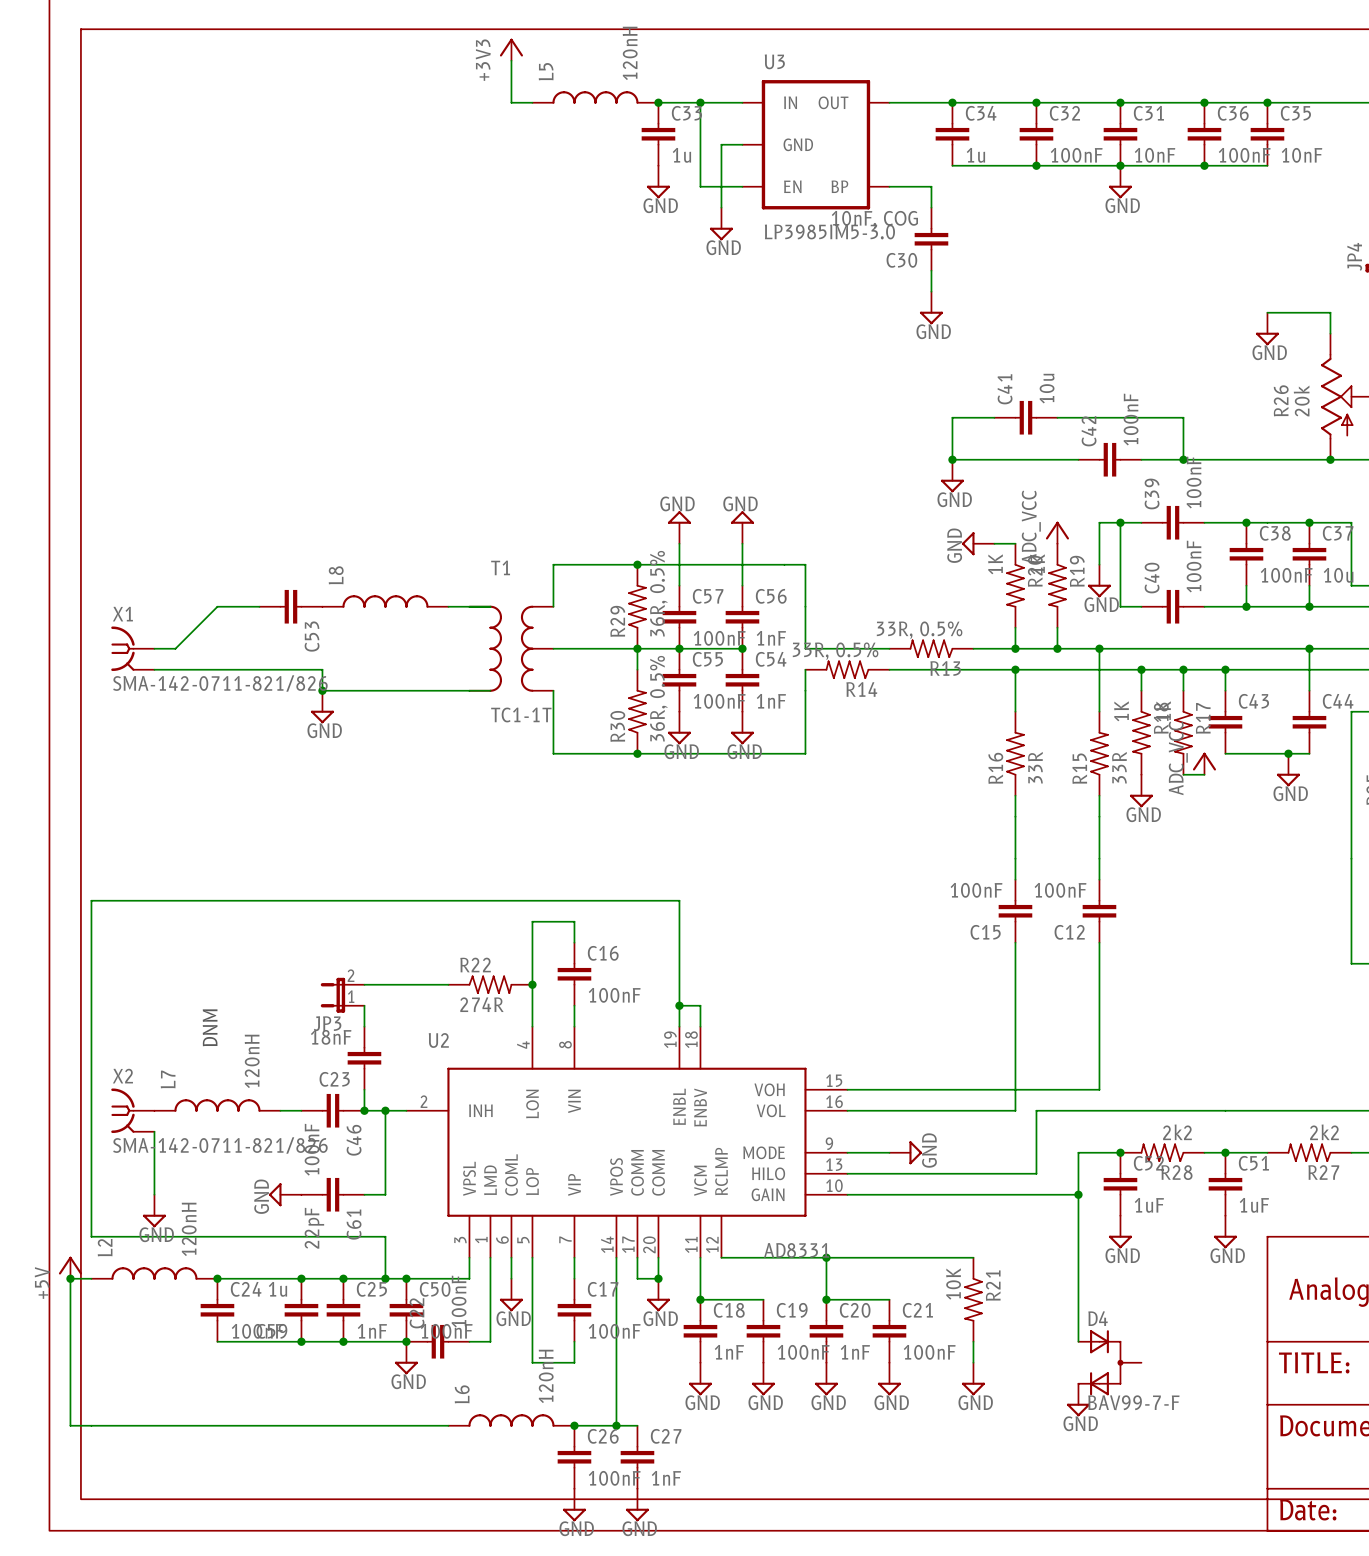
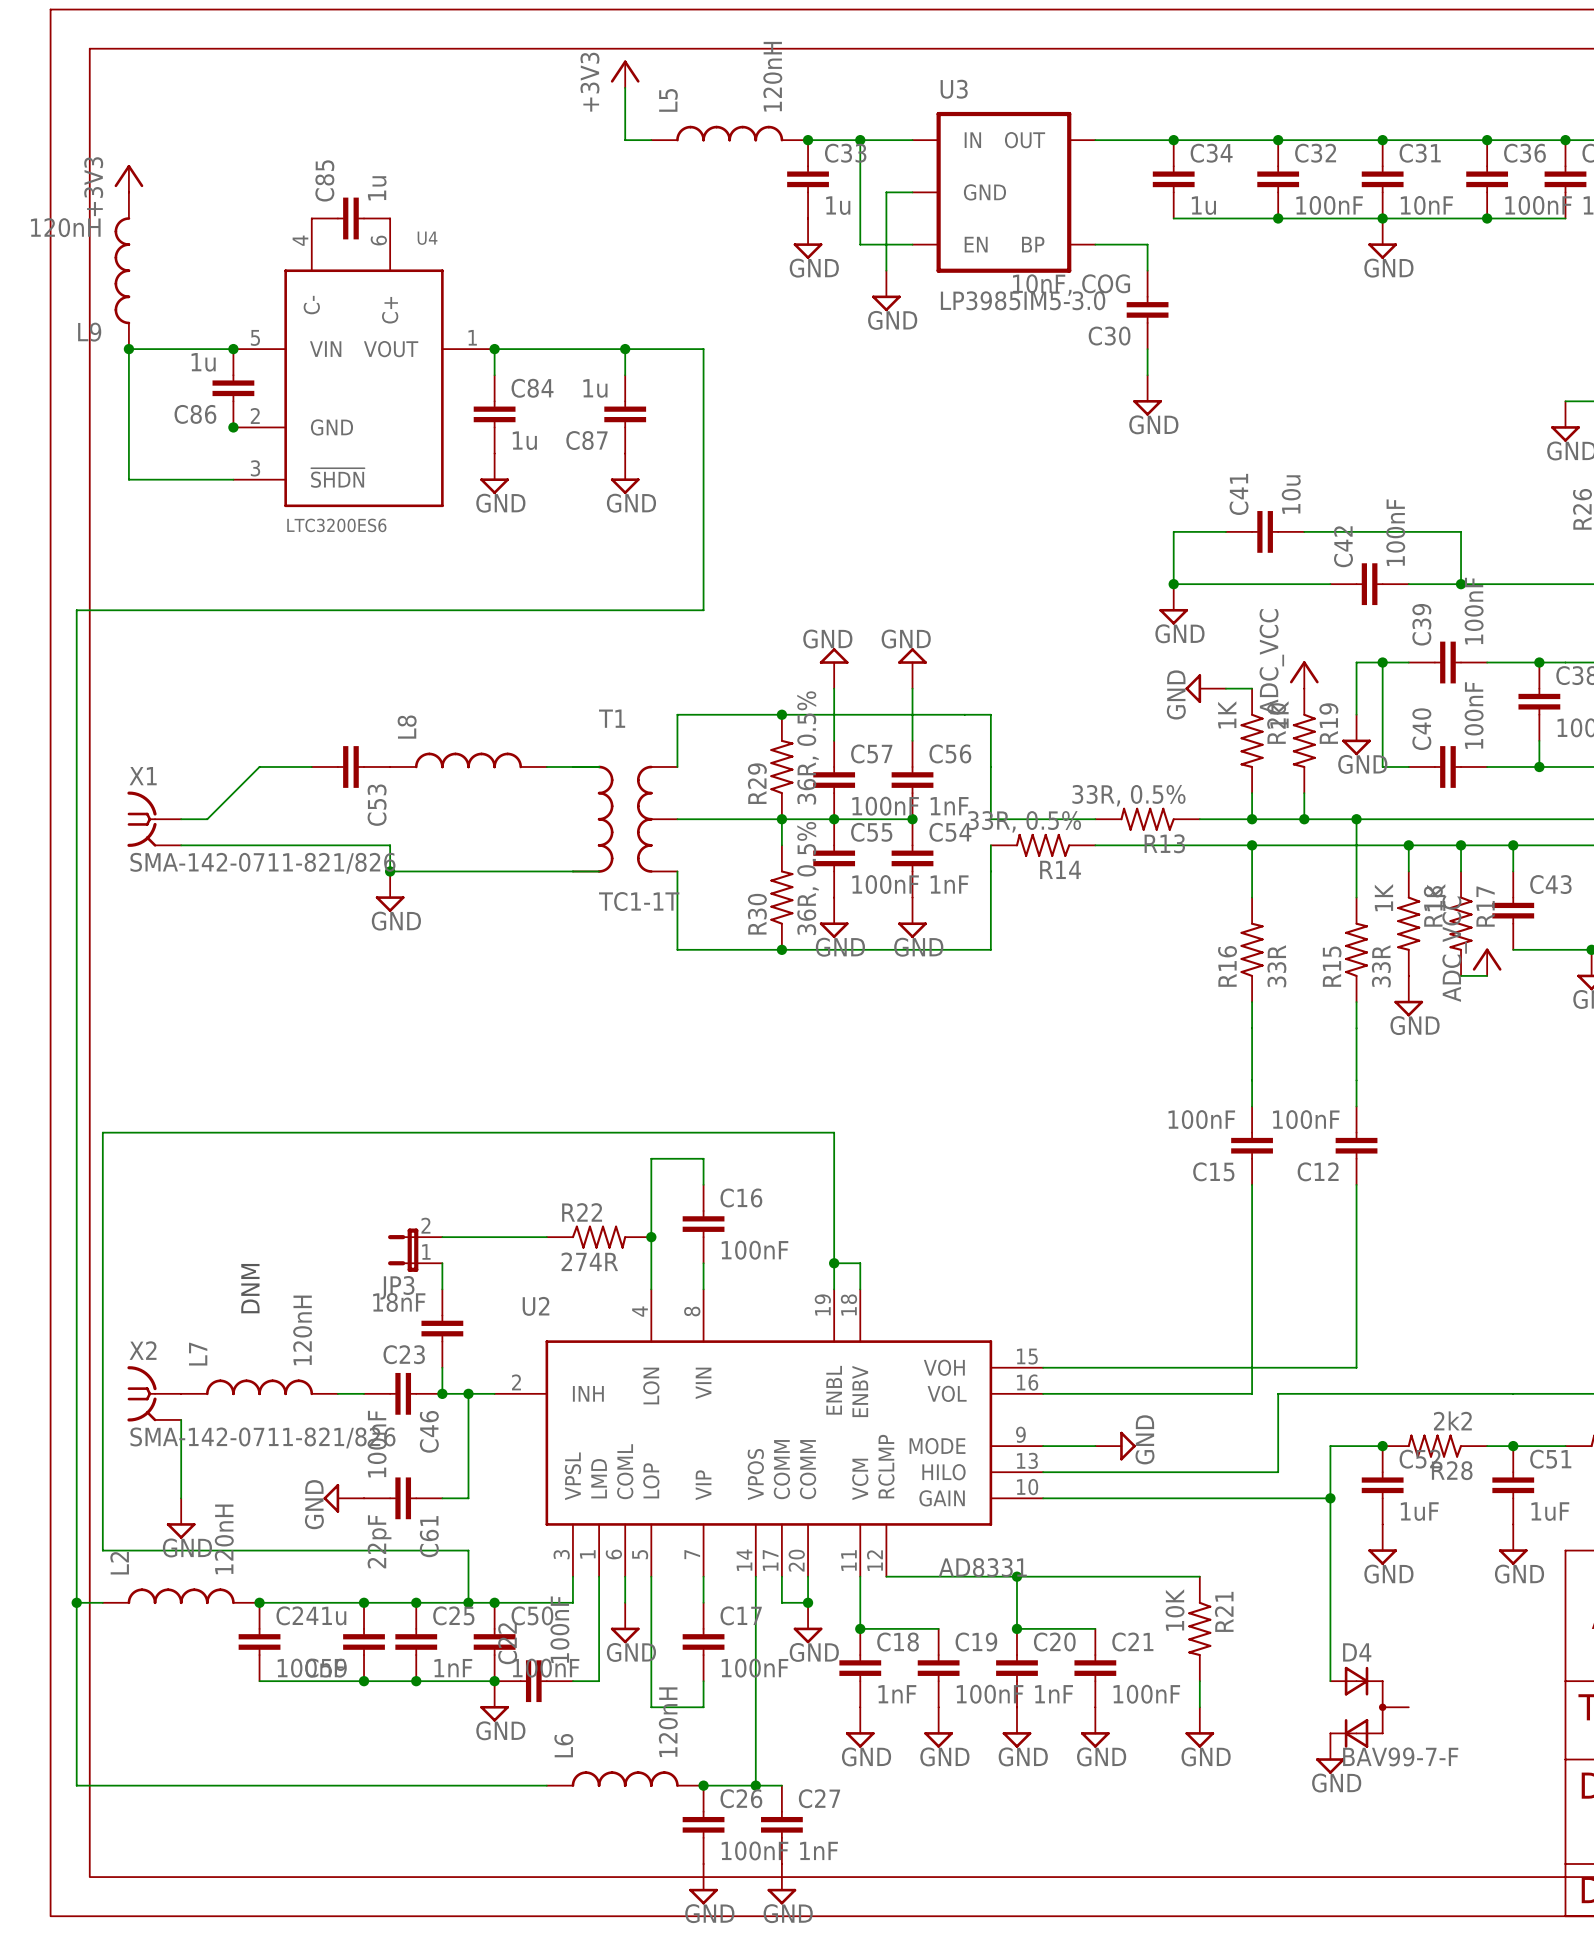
power symbol: none -> +3V3 (128, 178)
C85: none -> 1u (350, 218)
L9: none -> 120nH (122, 270)
junction: none -> (128, 349)
wire: none -> (233, 349) (128, 349) (128, 479) (233, 479)
junction: none -> (233, 349)
junction: none -> (494, 349)
wire: none -> (625, 349) (625, 375)
junction: none -> (625, 349)
U4: none -> LTC3200ES6 (364, 362)
wire: none -> (494, 375) (494, 349) (703, 349) (703, 610) (76, 610) (76, 1602)
C86: none -> 1u (233, 388)
C84: none -> 1u (494, 414)
C87: none -> 1u (625, 414)
junction: none -> (233, 427)
power symbol: none -> GND (494, 473)
power symbol: none -> GND (625, 473)
power symbol: +5V (70, 1267) -> none

